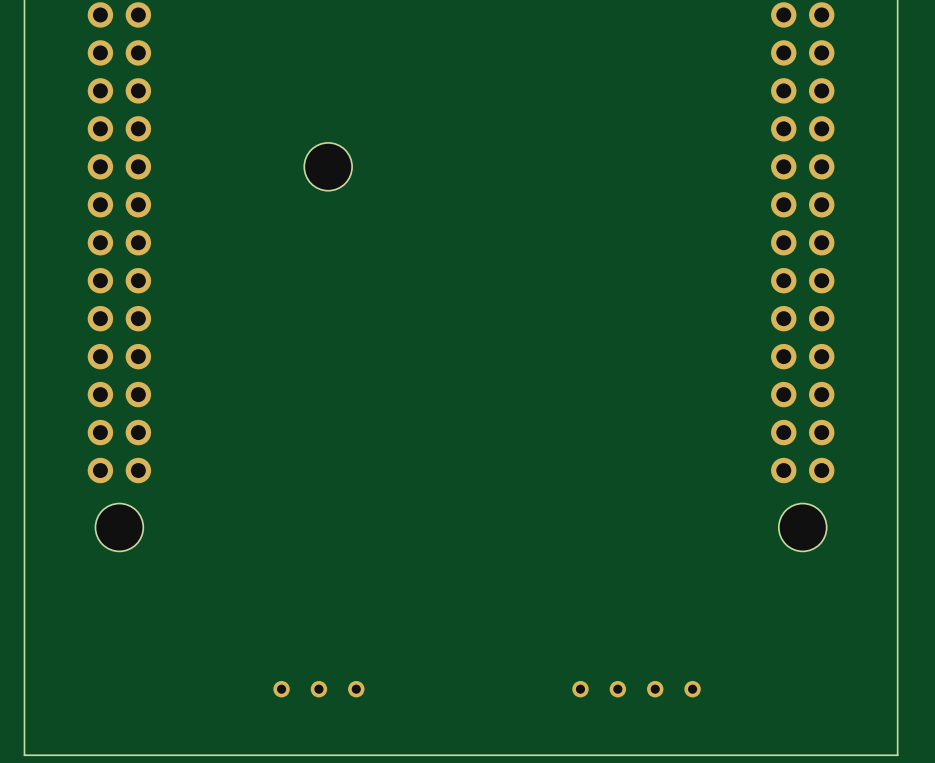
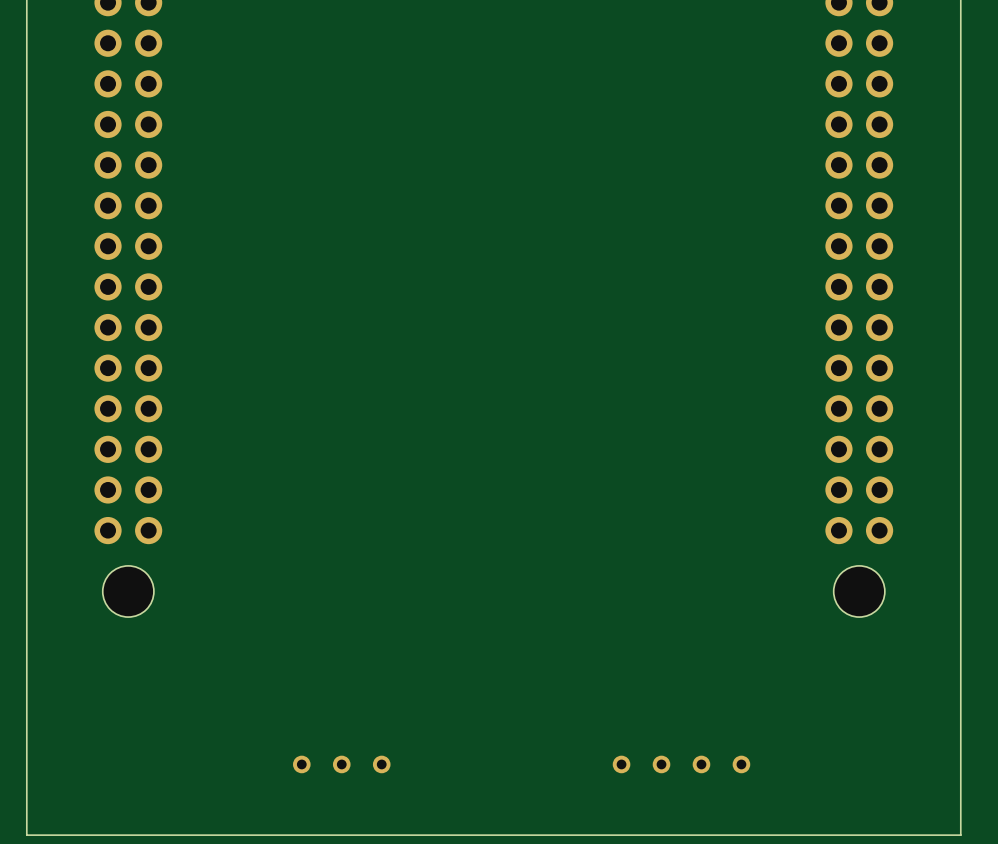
part: (328, 166) -> none

